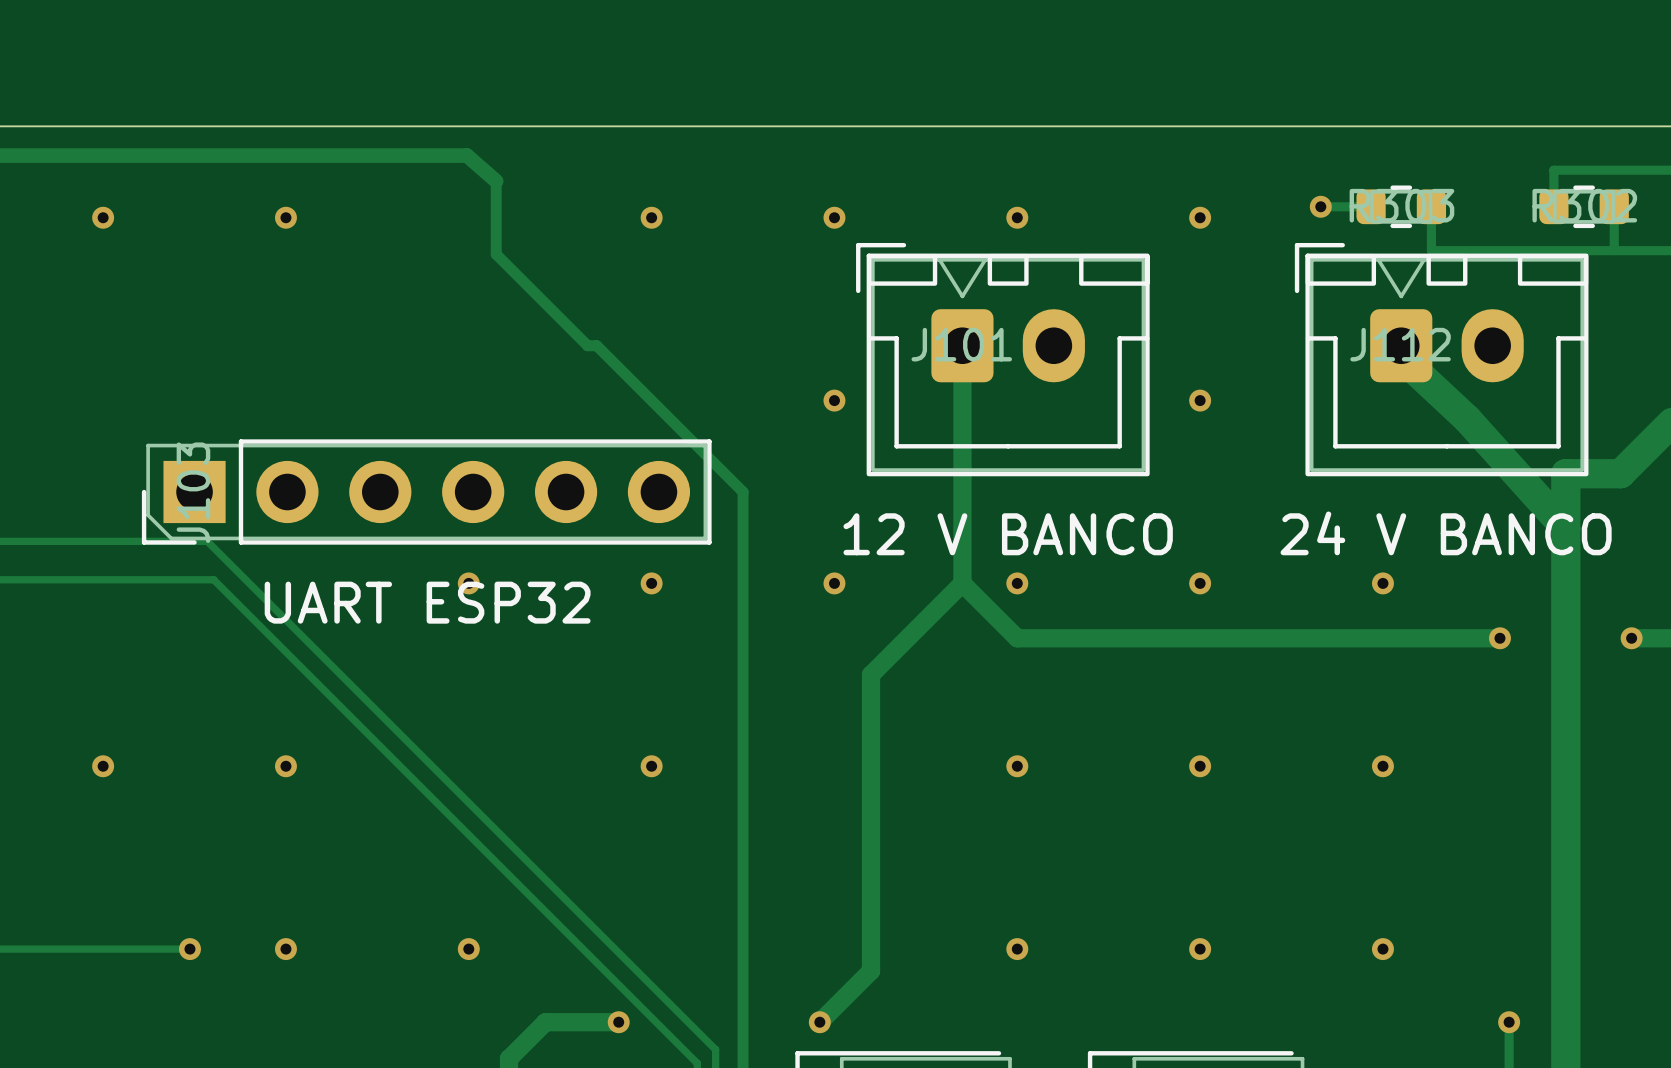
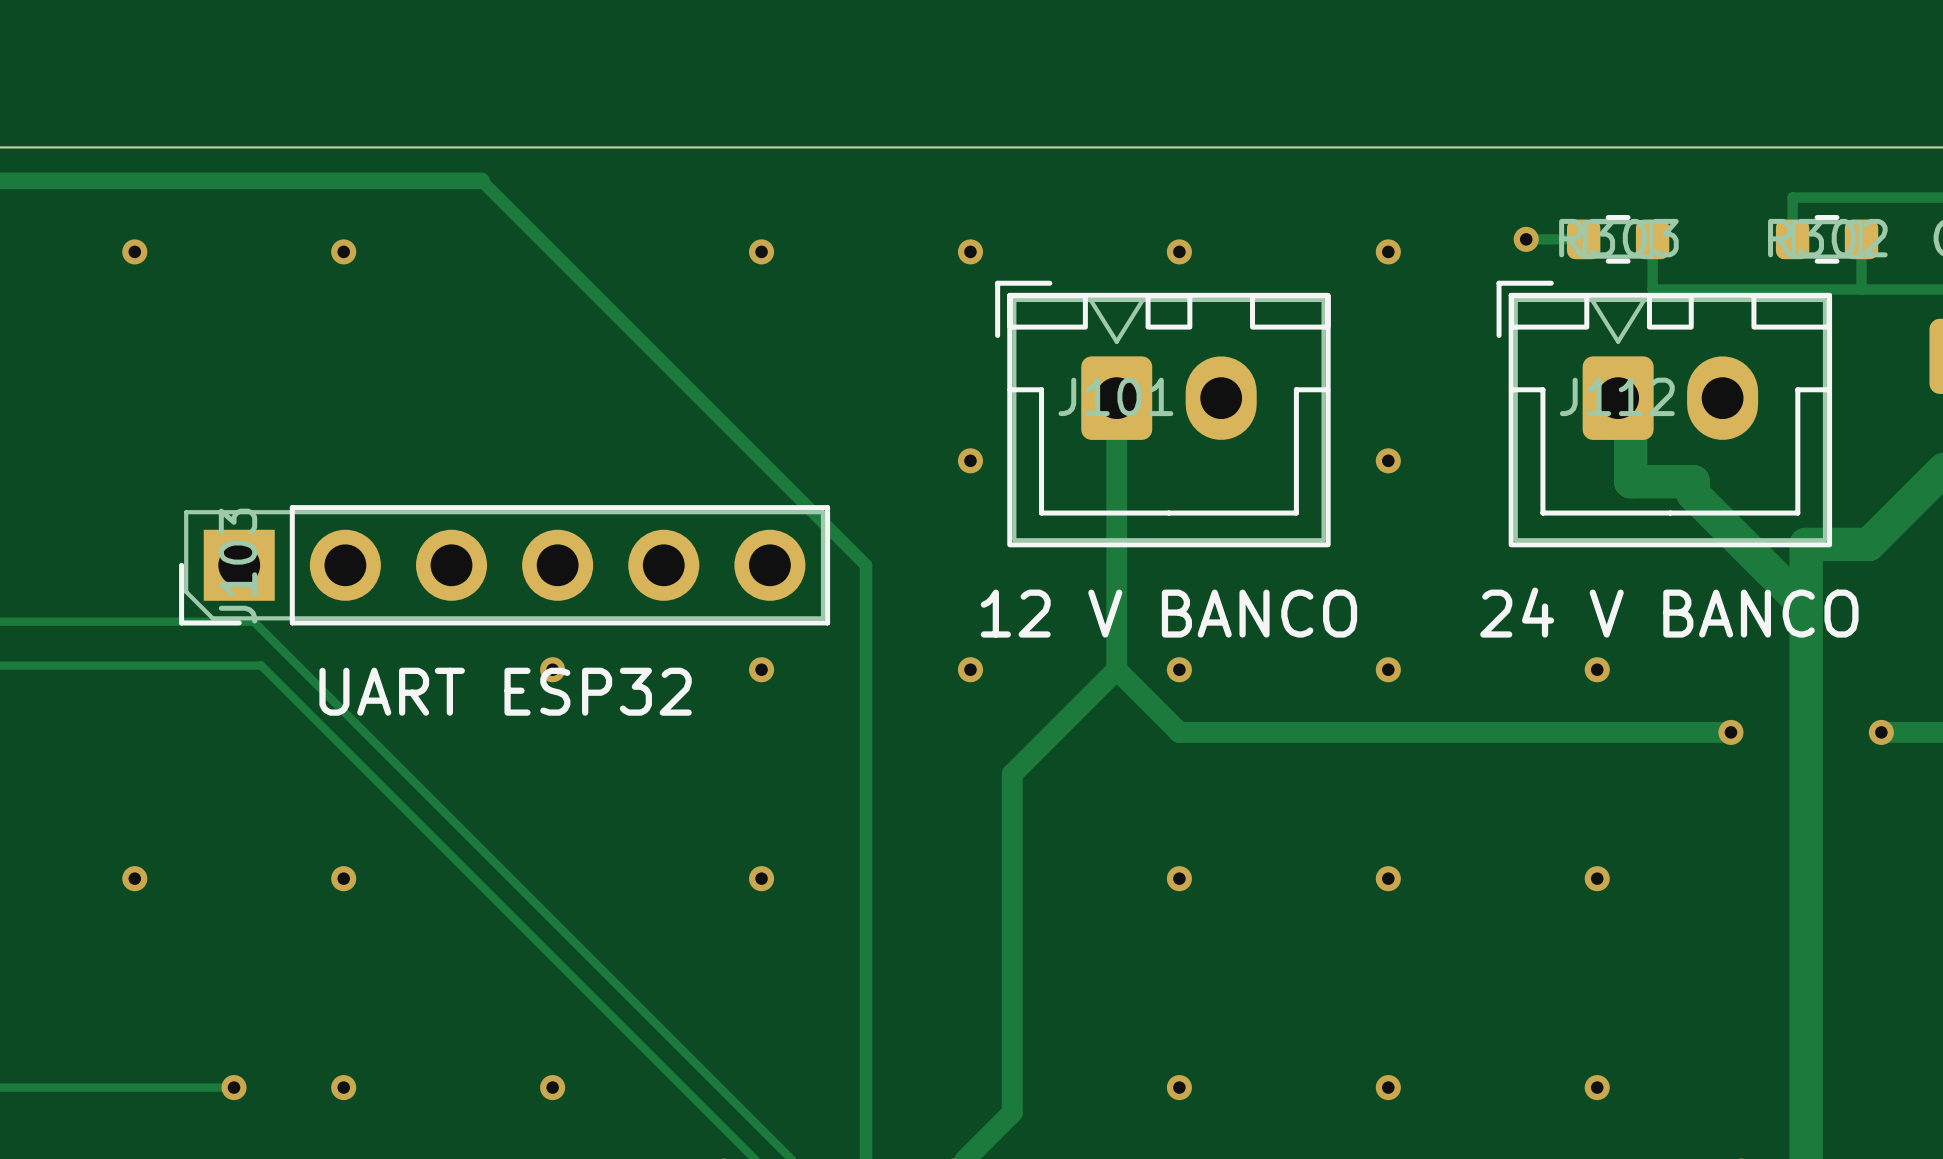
track: (406, 155) (466, 155) (496, 181) (496, 254) (587, 345) (596, 345) -> (481, 180) (698, 398)
track: (1412, 367) (1467, 418) (1565, 528) -> (1630, 423) (1630, 481) (1693, 481) (1693, 494) (1806, 607)

